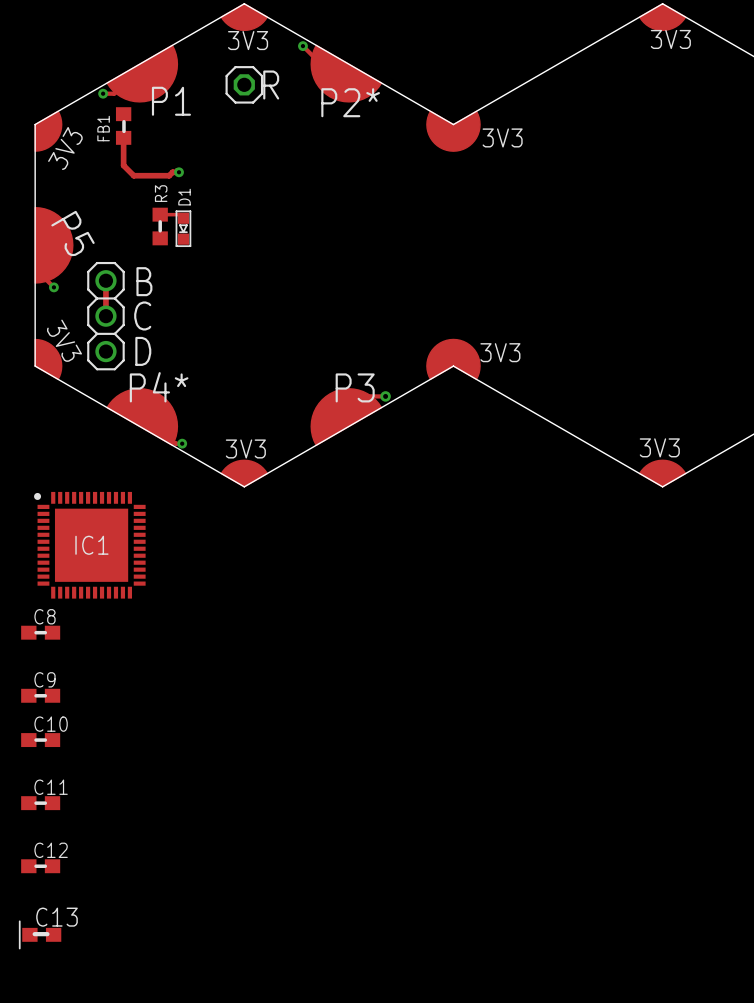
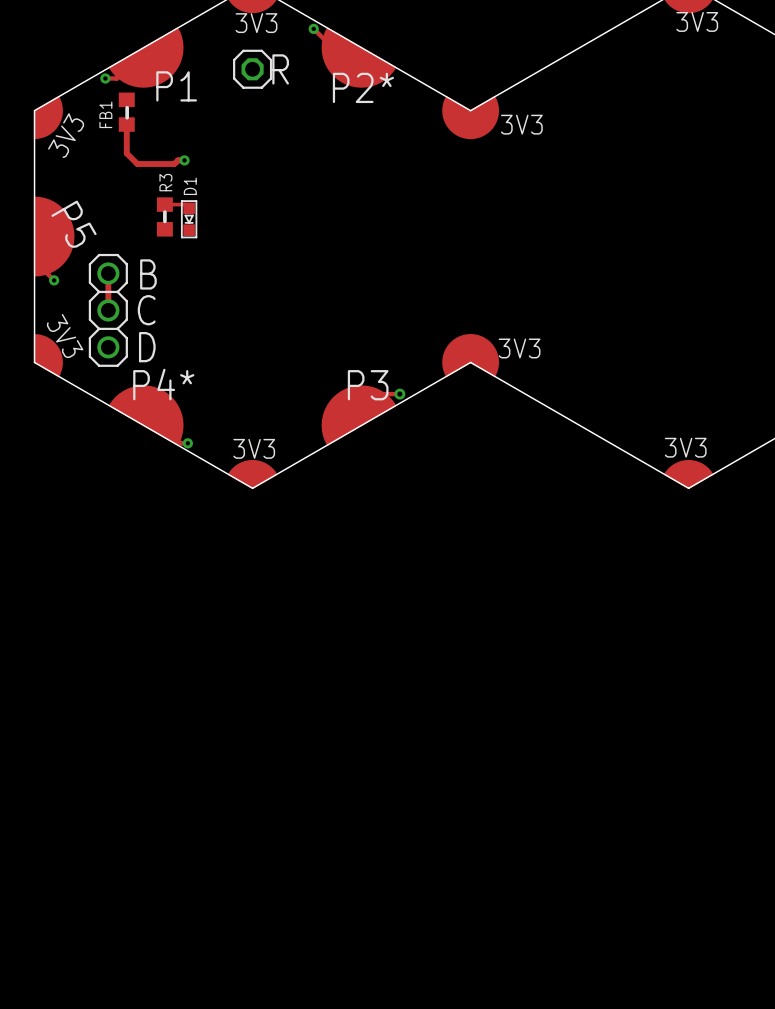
IC1: (89, 545) -> none
C8: (40, 632) -> none
C9: (40, 695) -> none
C10: (40, 740) -> none
C11: (40, 803) -> none
C12: (40, 866) -> none
C13: (40, 934) -> none

